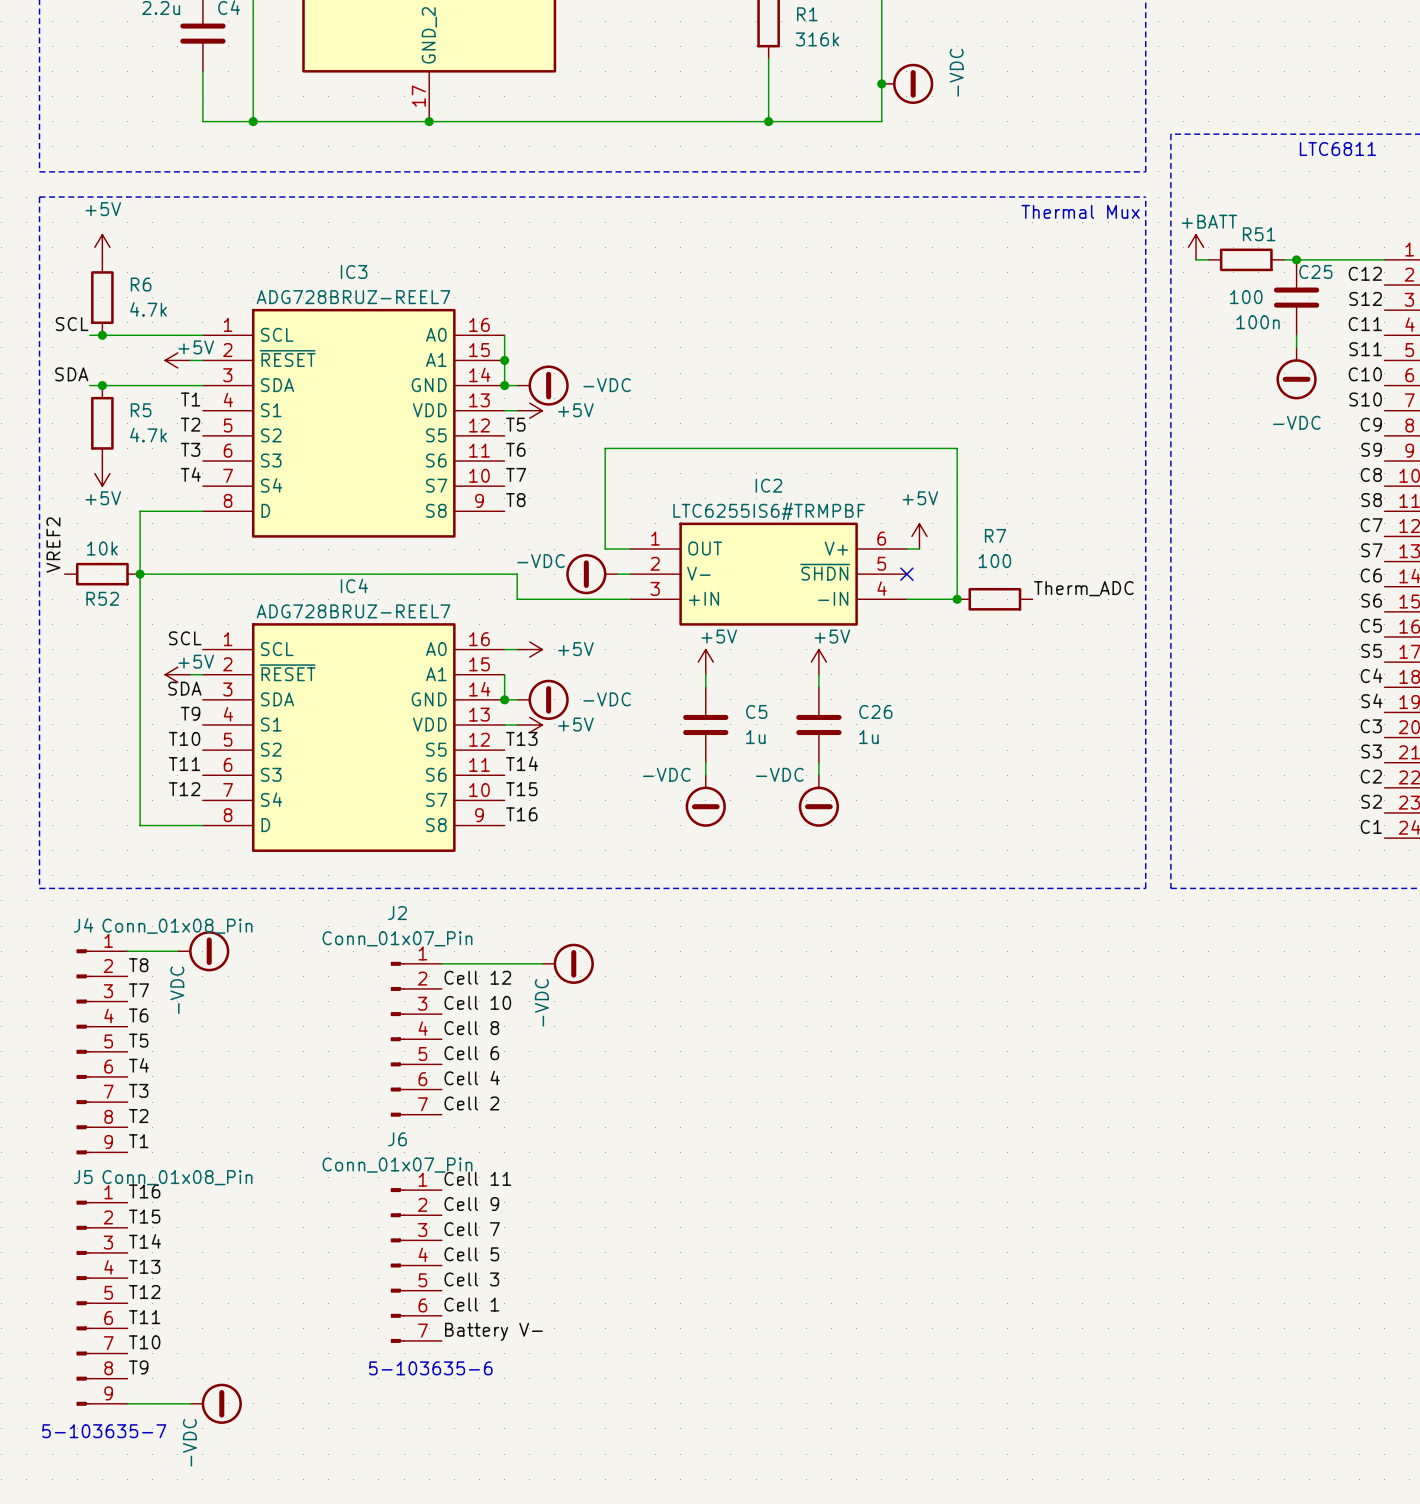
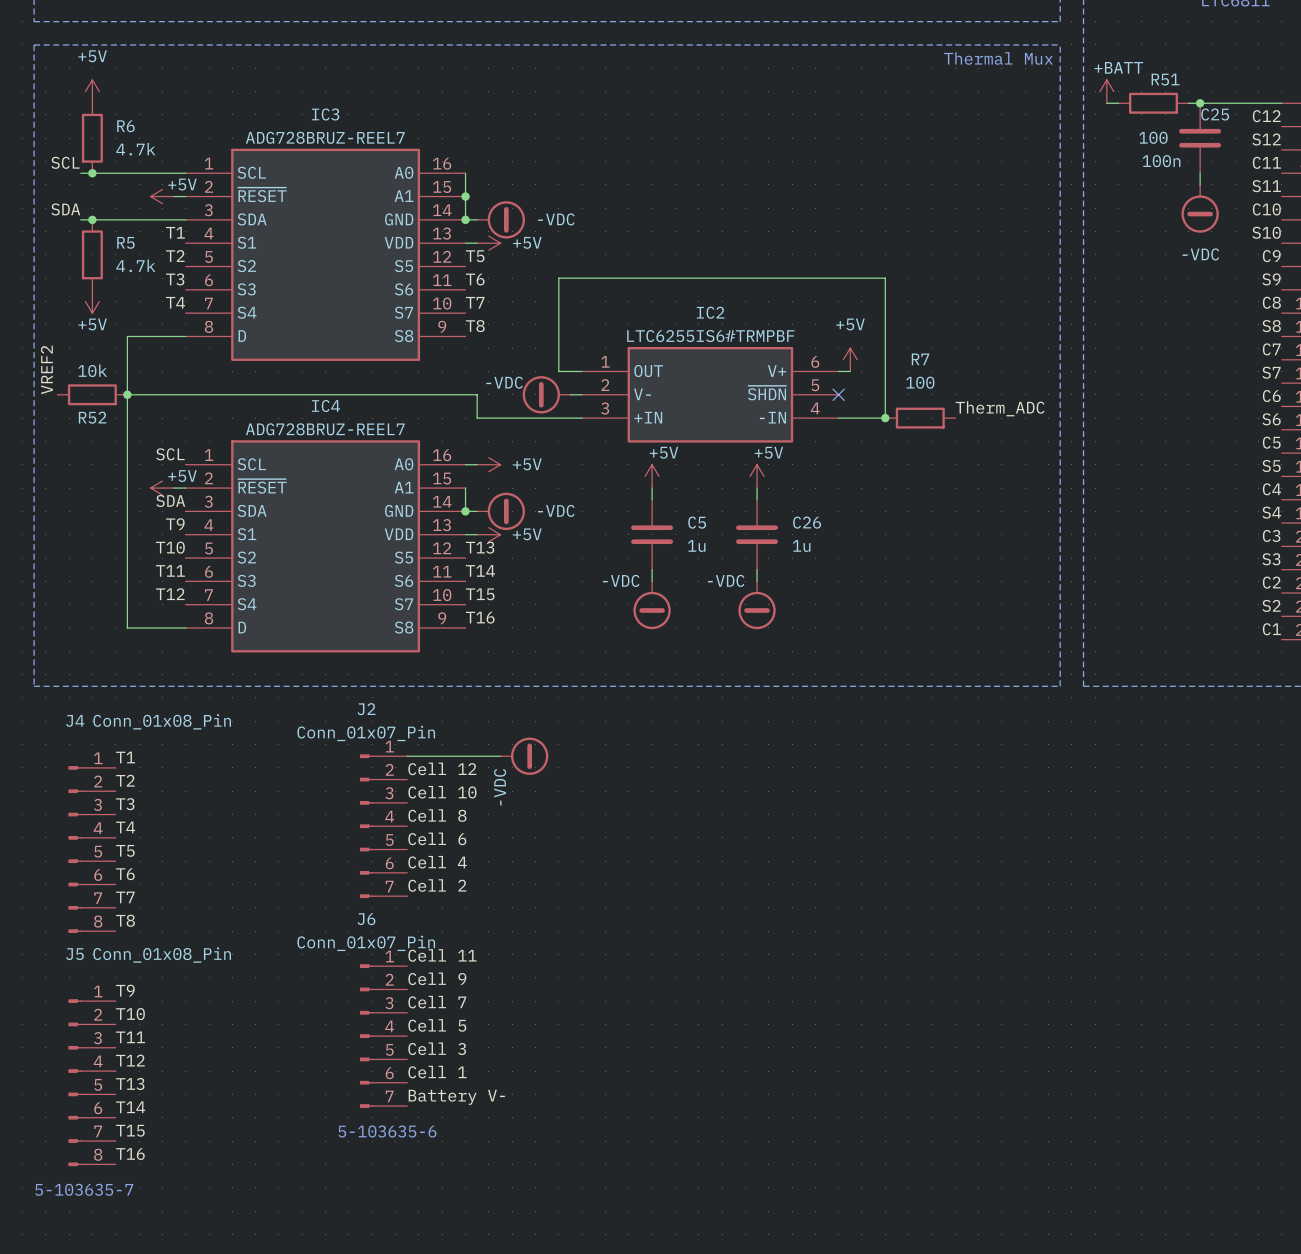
J4 symbol: [76, 949, 128, 1155] -> [68, 766, 116, 934]
wire: (127, 951) (177, 951) -> none
power symbol: -VDC (203, 951) -> none
label: T8 (138, 965) -> T1 (125, 757)
label: T7 (138, 990) -> T2 (125, 780)
label: T6 (138, 1015) -> T3 (125, 804)
label: T5 (138, 1040) -> T4 (125, 827)
label: T4 (138, 1065) -> T5 (125, 850)
label: T3 (138, 1090) -> T6 (125, 874)
label: T2 (138, 1116) -> T7 (125, 897)
label: T1 (138, 1141) -> T8 (125, 920)
label position: T16 (144, 1191) -> T16 (130, 1154)
J5 symbol: [76, 1200, 128, 1406] -> [68, 999, 116, 1167]
label: T15 (144, 1216) -> T9 (125, 990)
label: T14 (144, 1241) -> T10 (130, 1014)
label: T13 (144, 1266) -> T11 (130, 1037)
label: T11 (144, 1317) -> T13 (130, 1084)
label: T10 (144, 1342) -> T14 (130, 1107)
label: T9 (138, 1367) -> T15 (130, 1130)
wire: (127, 1403) (190, 1403) -> none
power symbol: -VDC (216, 1403) -> none

